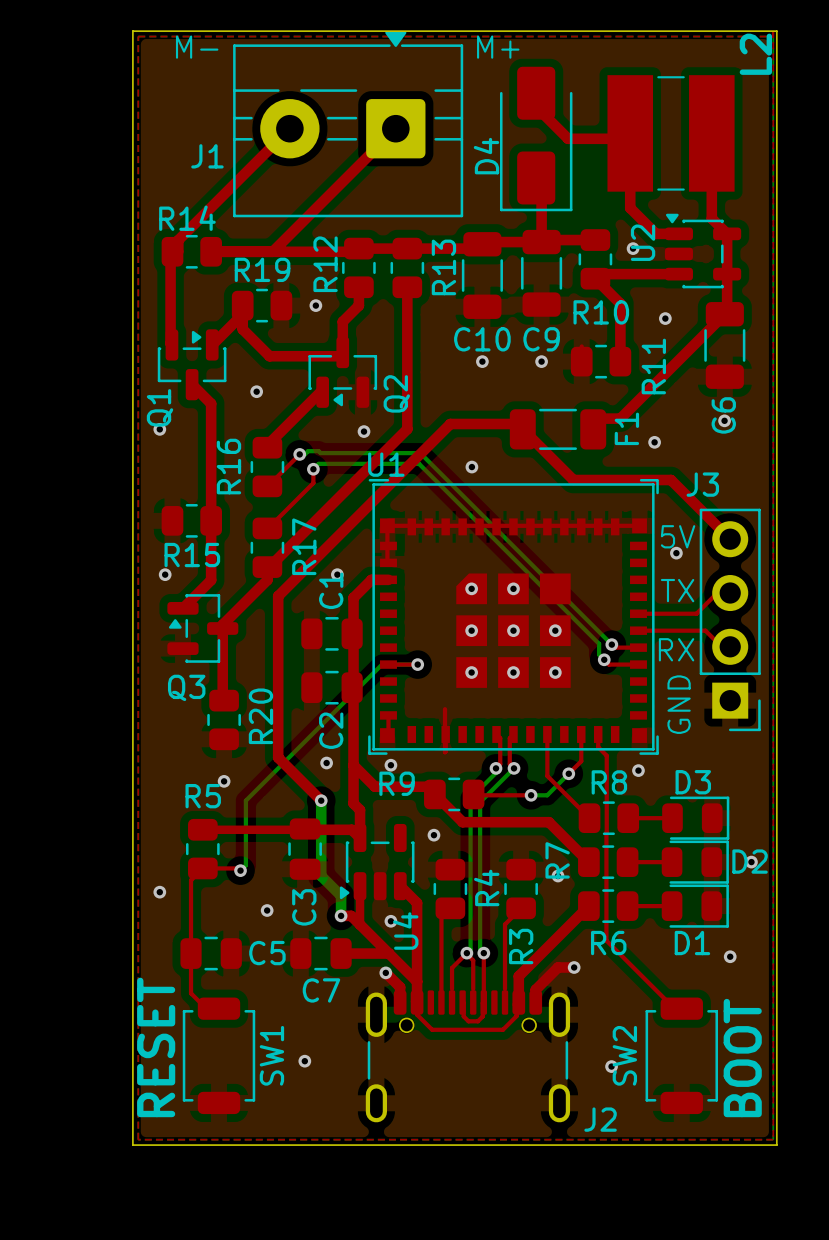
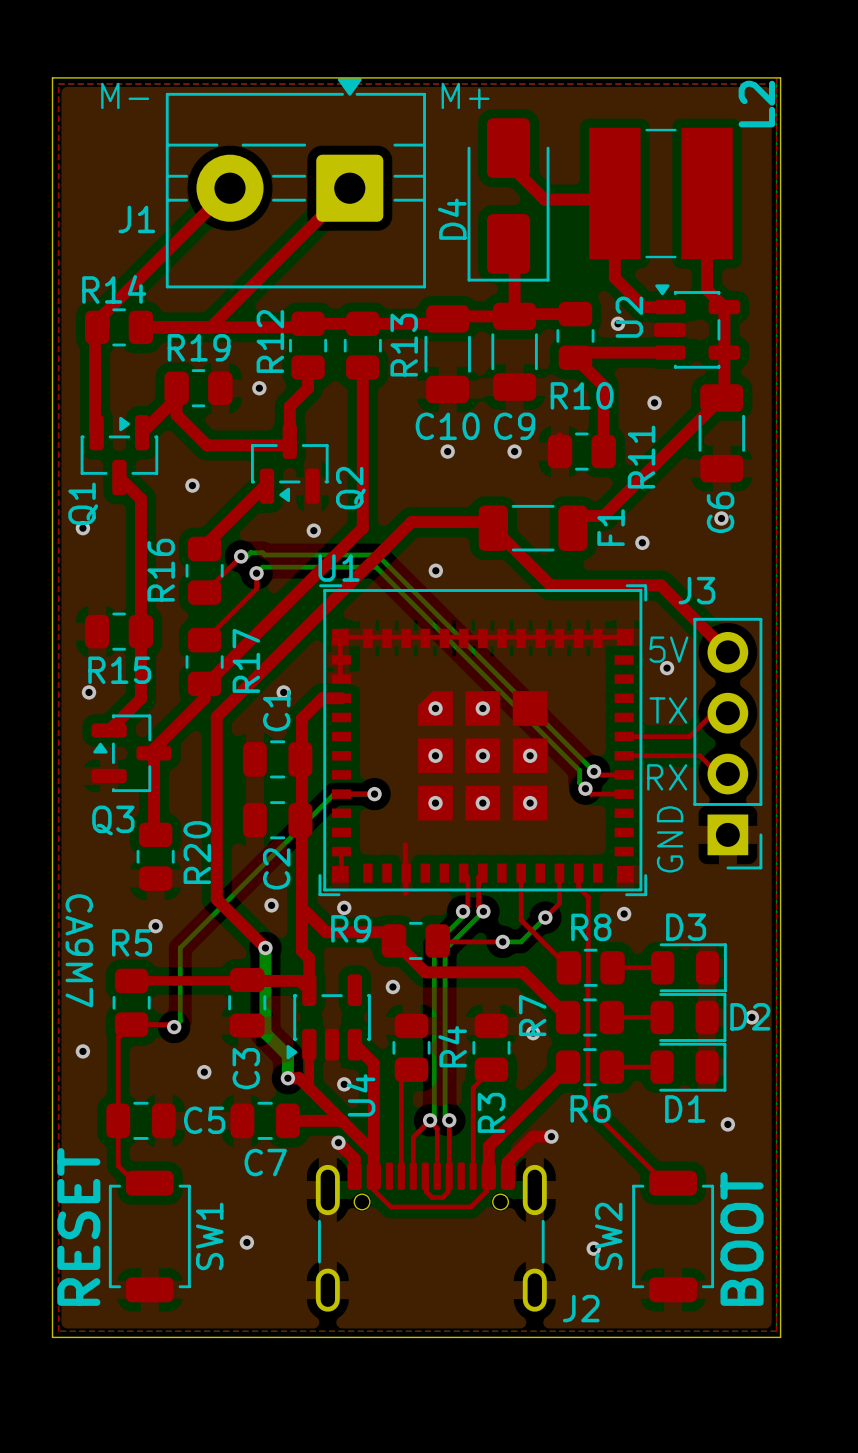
text: none -> CA9M7 (79, 950)

